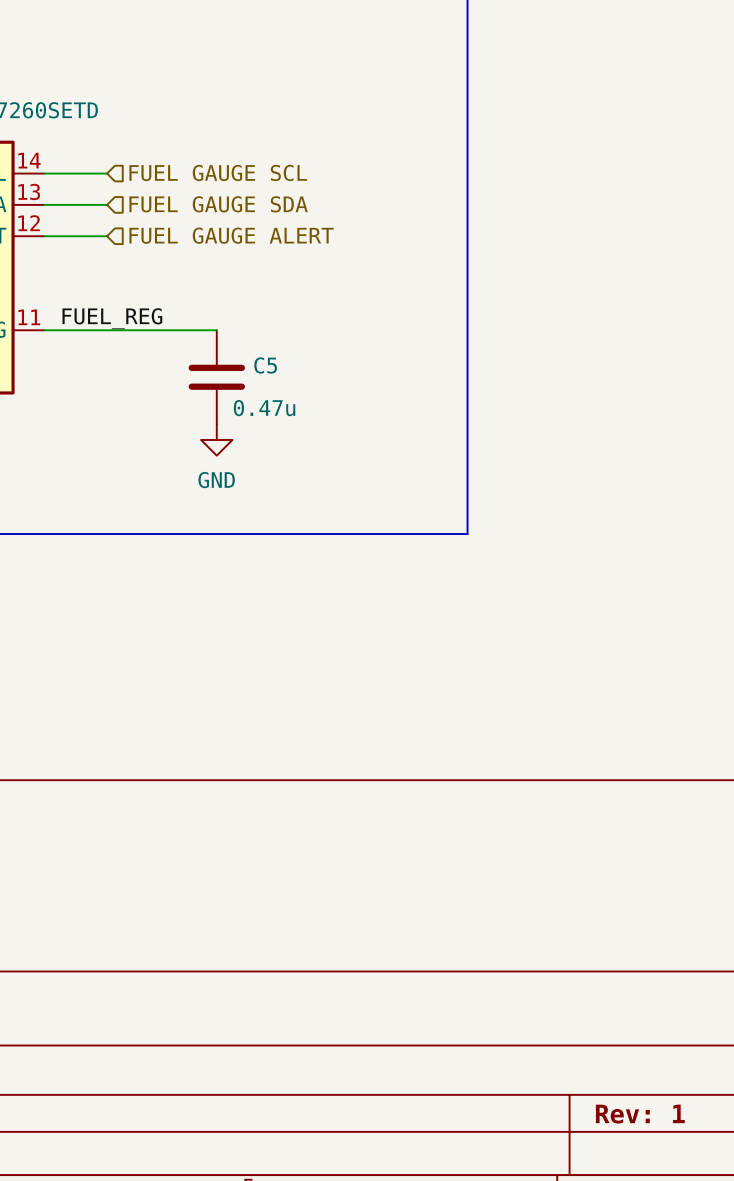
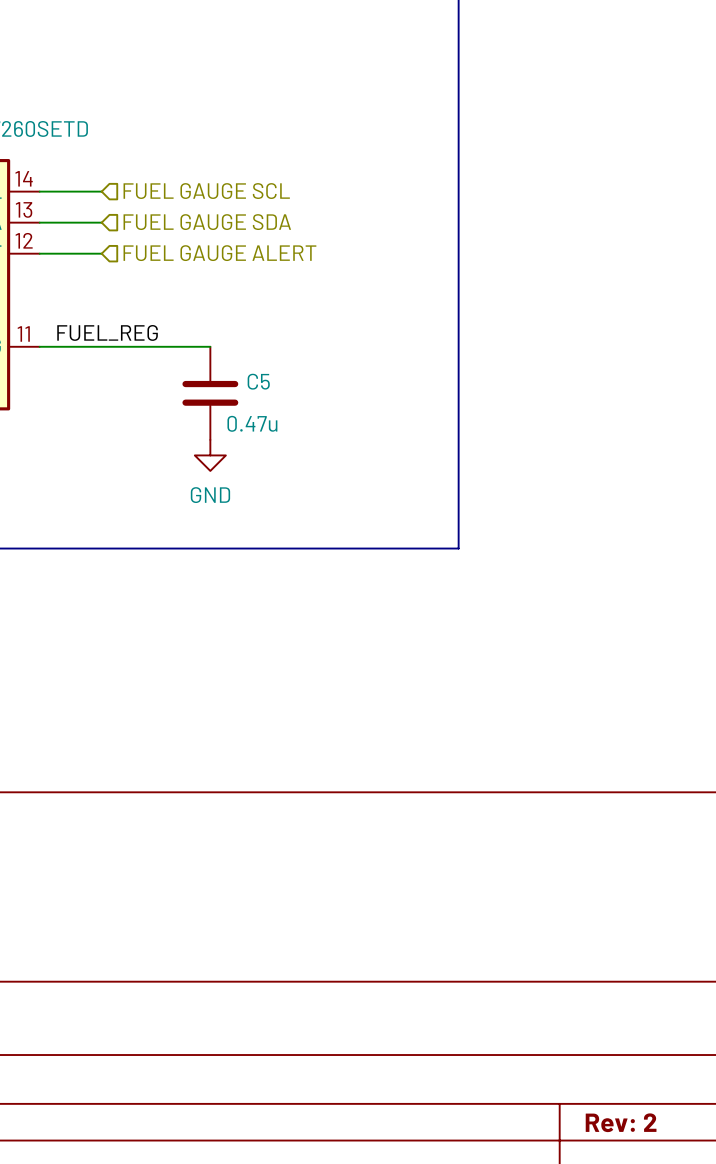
title block: Rev: 1 (640, 1114) -> Rev: 2 (621, 1122)

